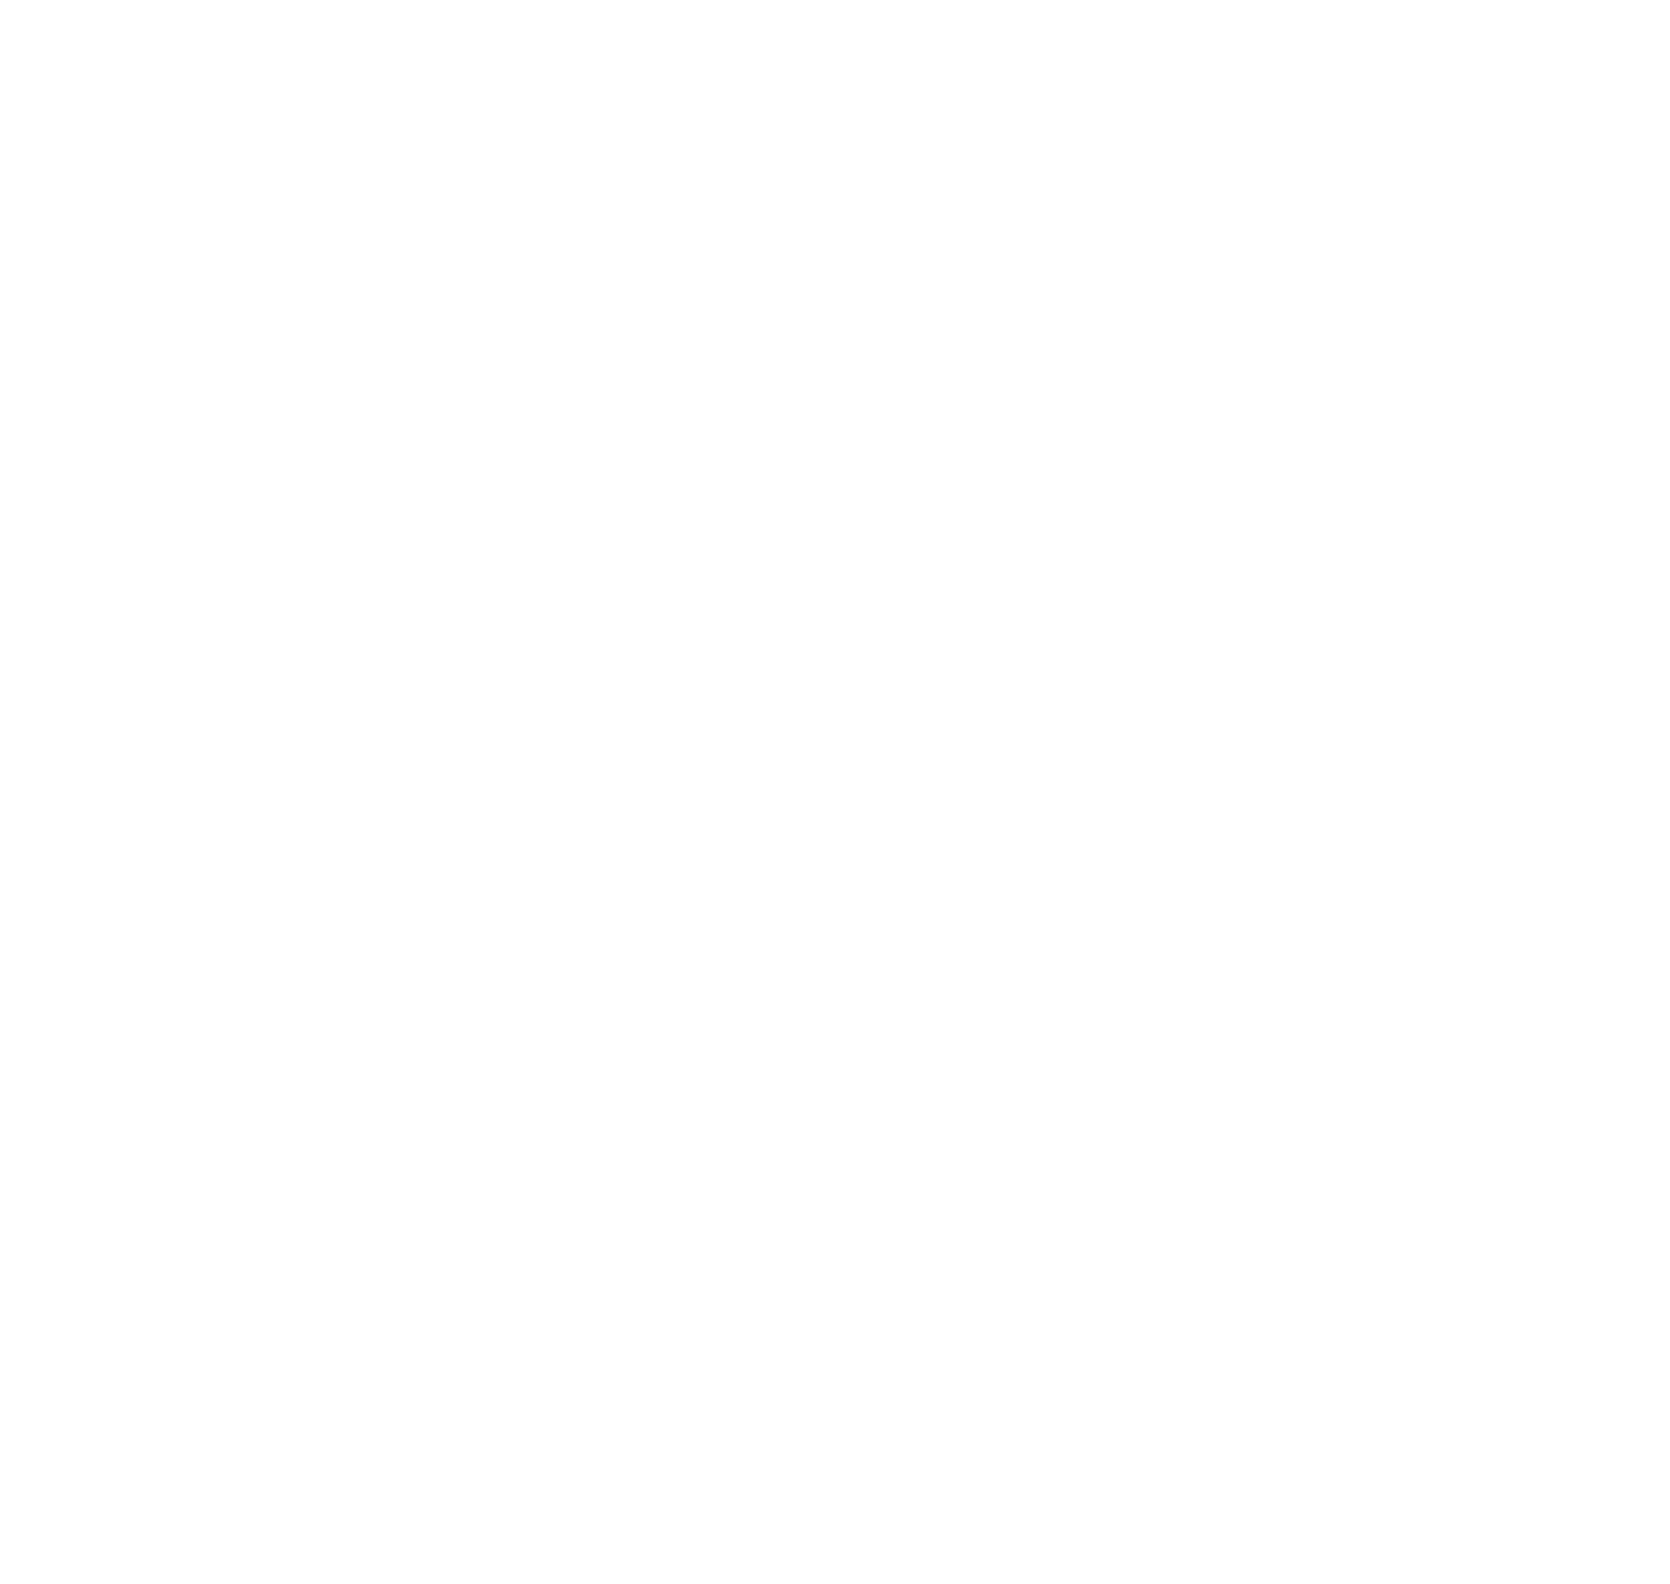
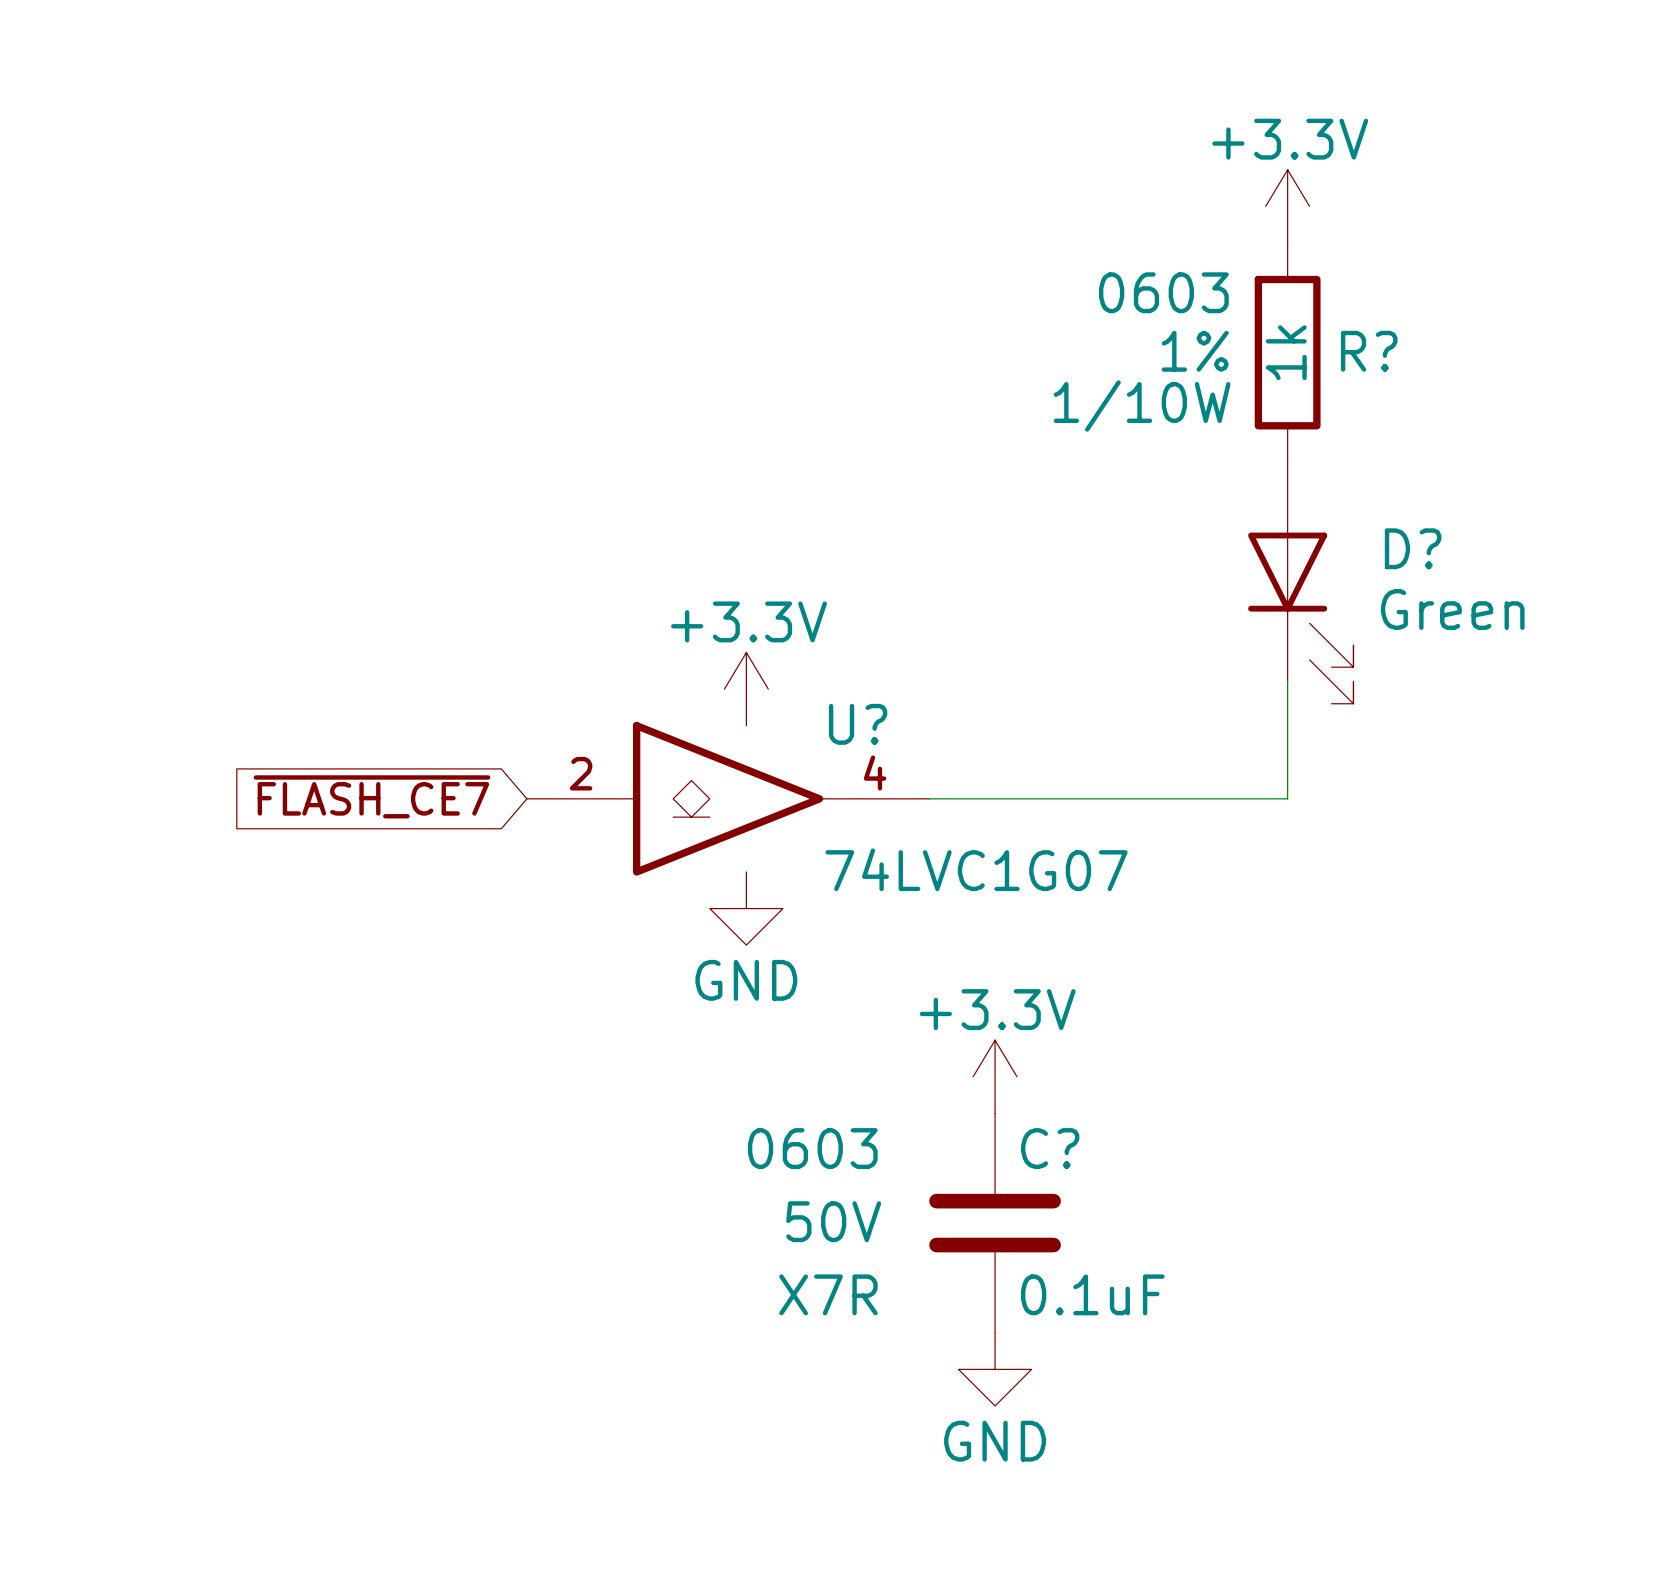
power symbol: none -> +3.3V (1287, 206)
R?: none -> 1k (1287, 352)
D?: none -> Green (1300, 583)
wire: none -> (1287, 681) (1287, 798) (929, 798)
power symbol: none -> +3.3V (746, 689)
global label: none -> ~{FLASH_CE7} (372, 796)
U?: none -> 74LVC1G07 (728, 798)
power symbol: none -> GND (746, 908)
power symbol: none -> +3.3V (995, 1076)
C?: none -> 0.1uF (995, 1223)
power symbol: none -> GND (995, 1369)

